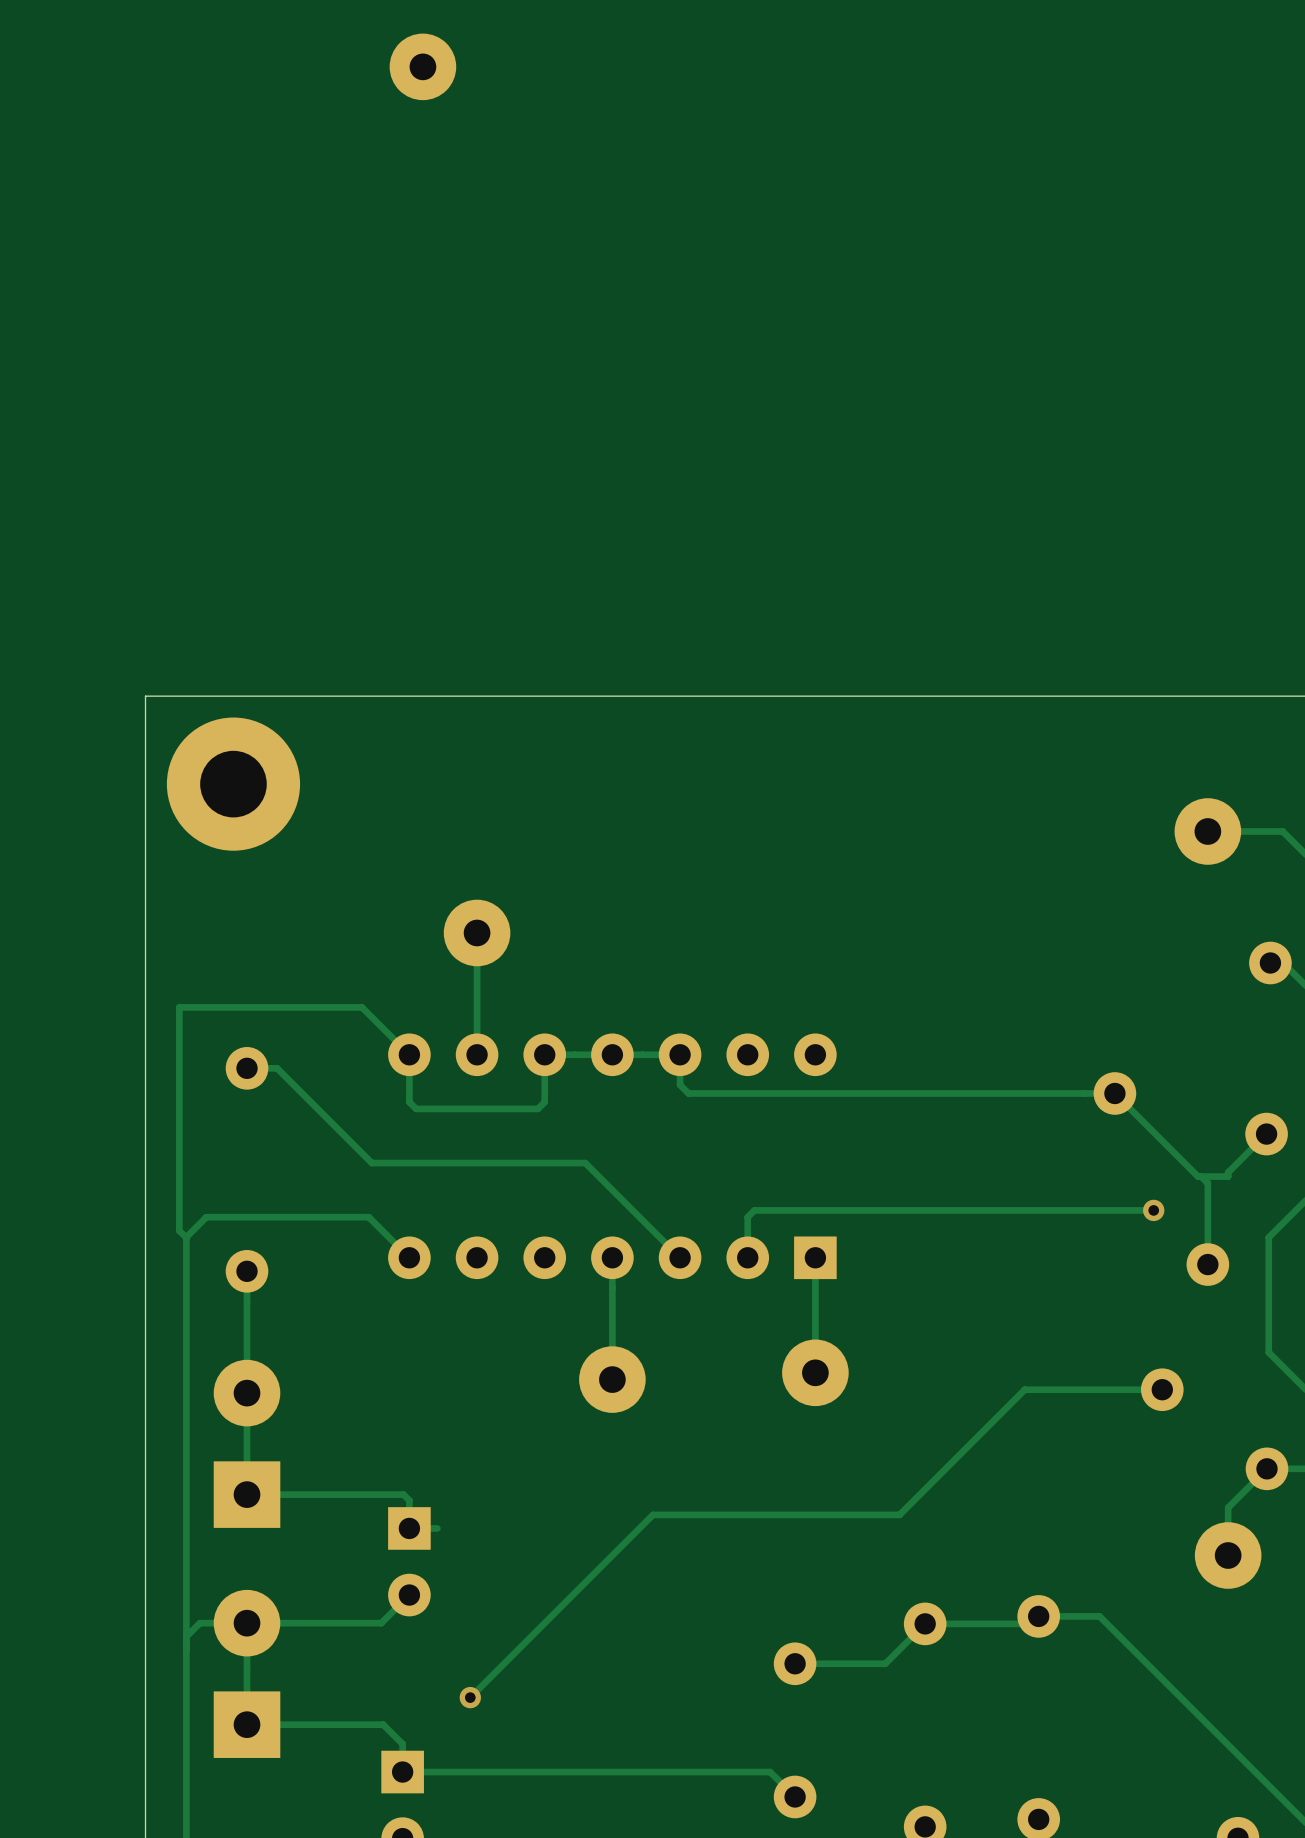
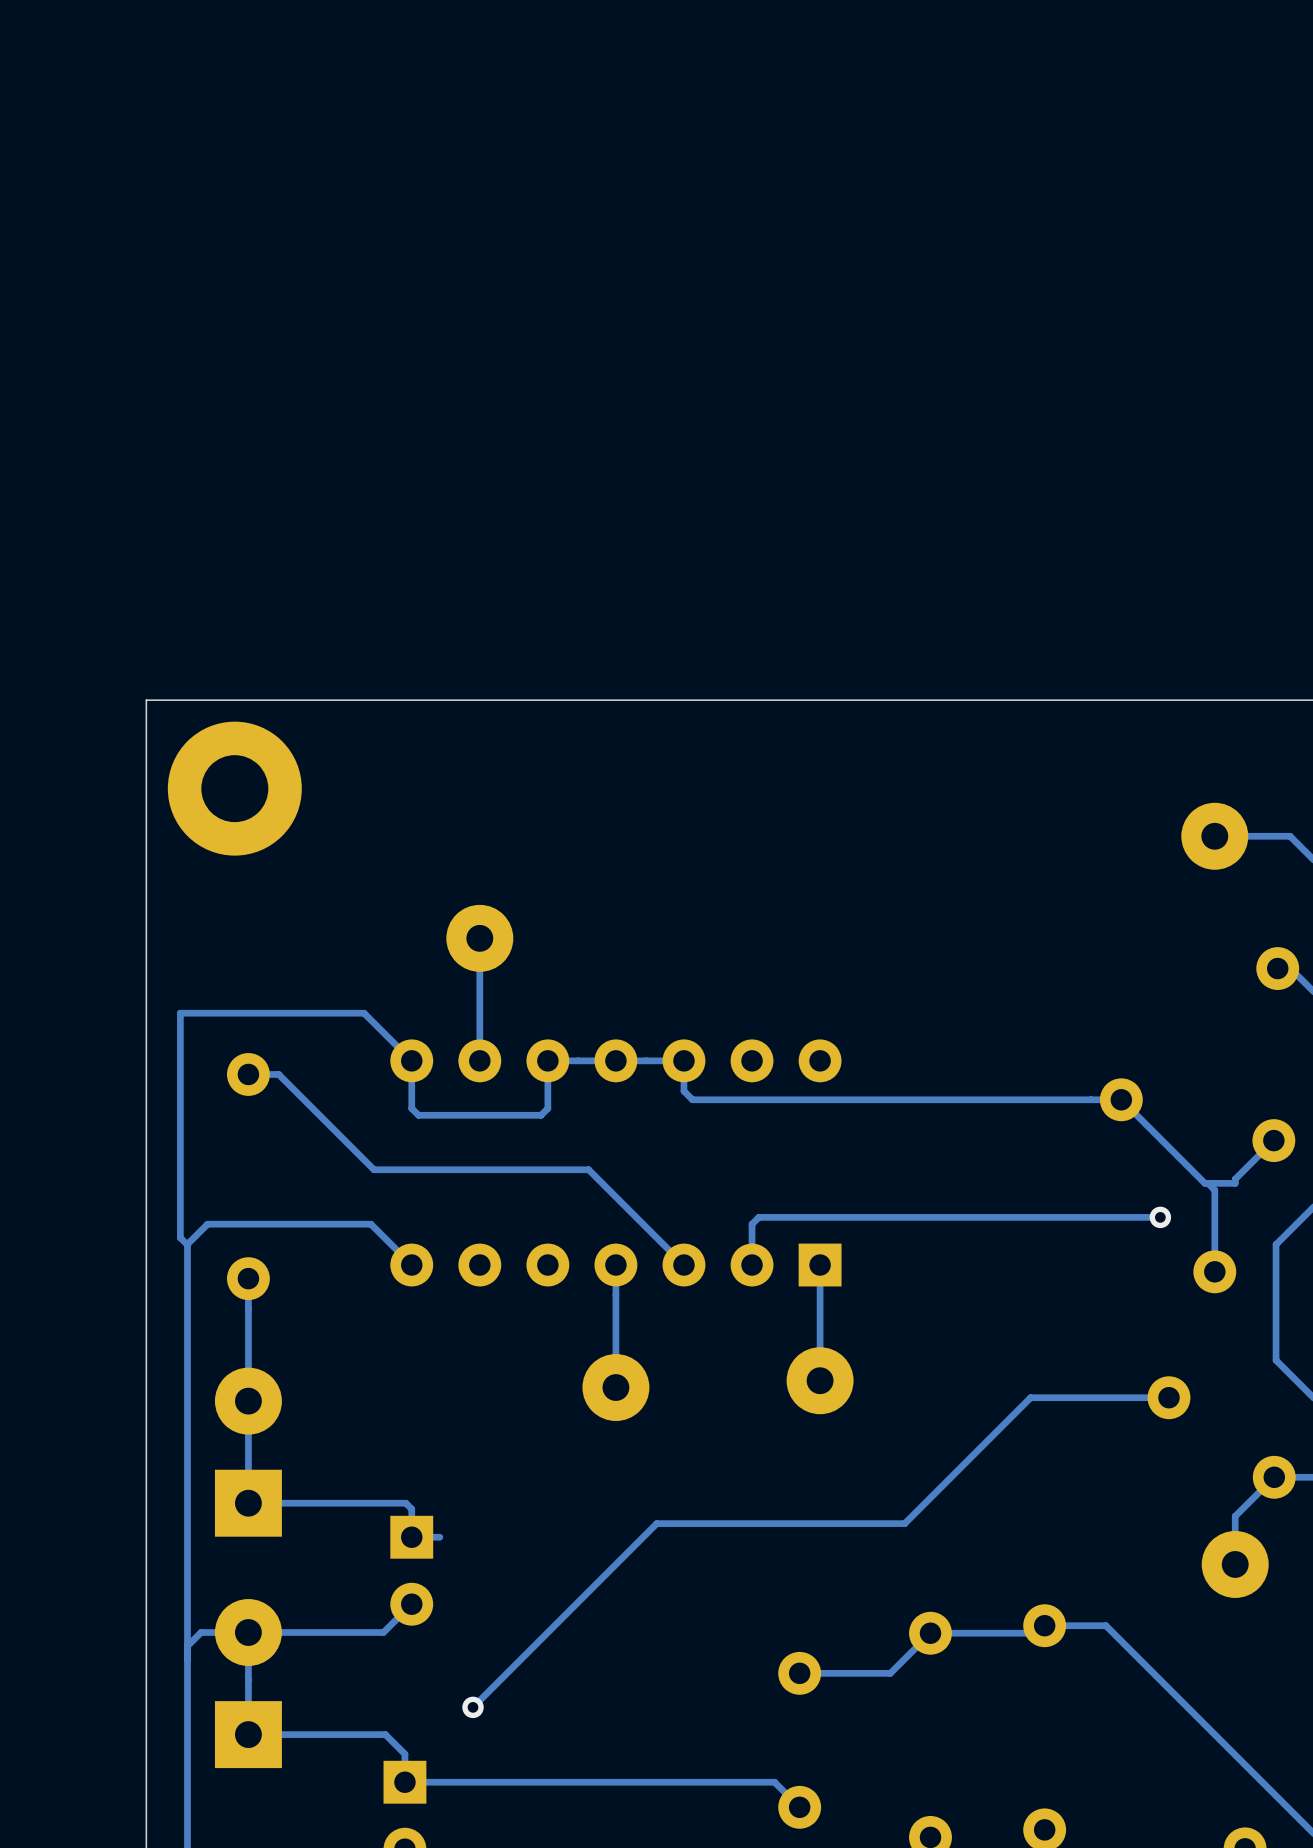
part: (422, 66) -> none

